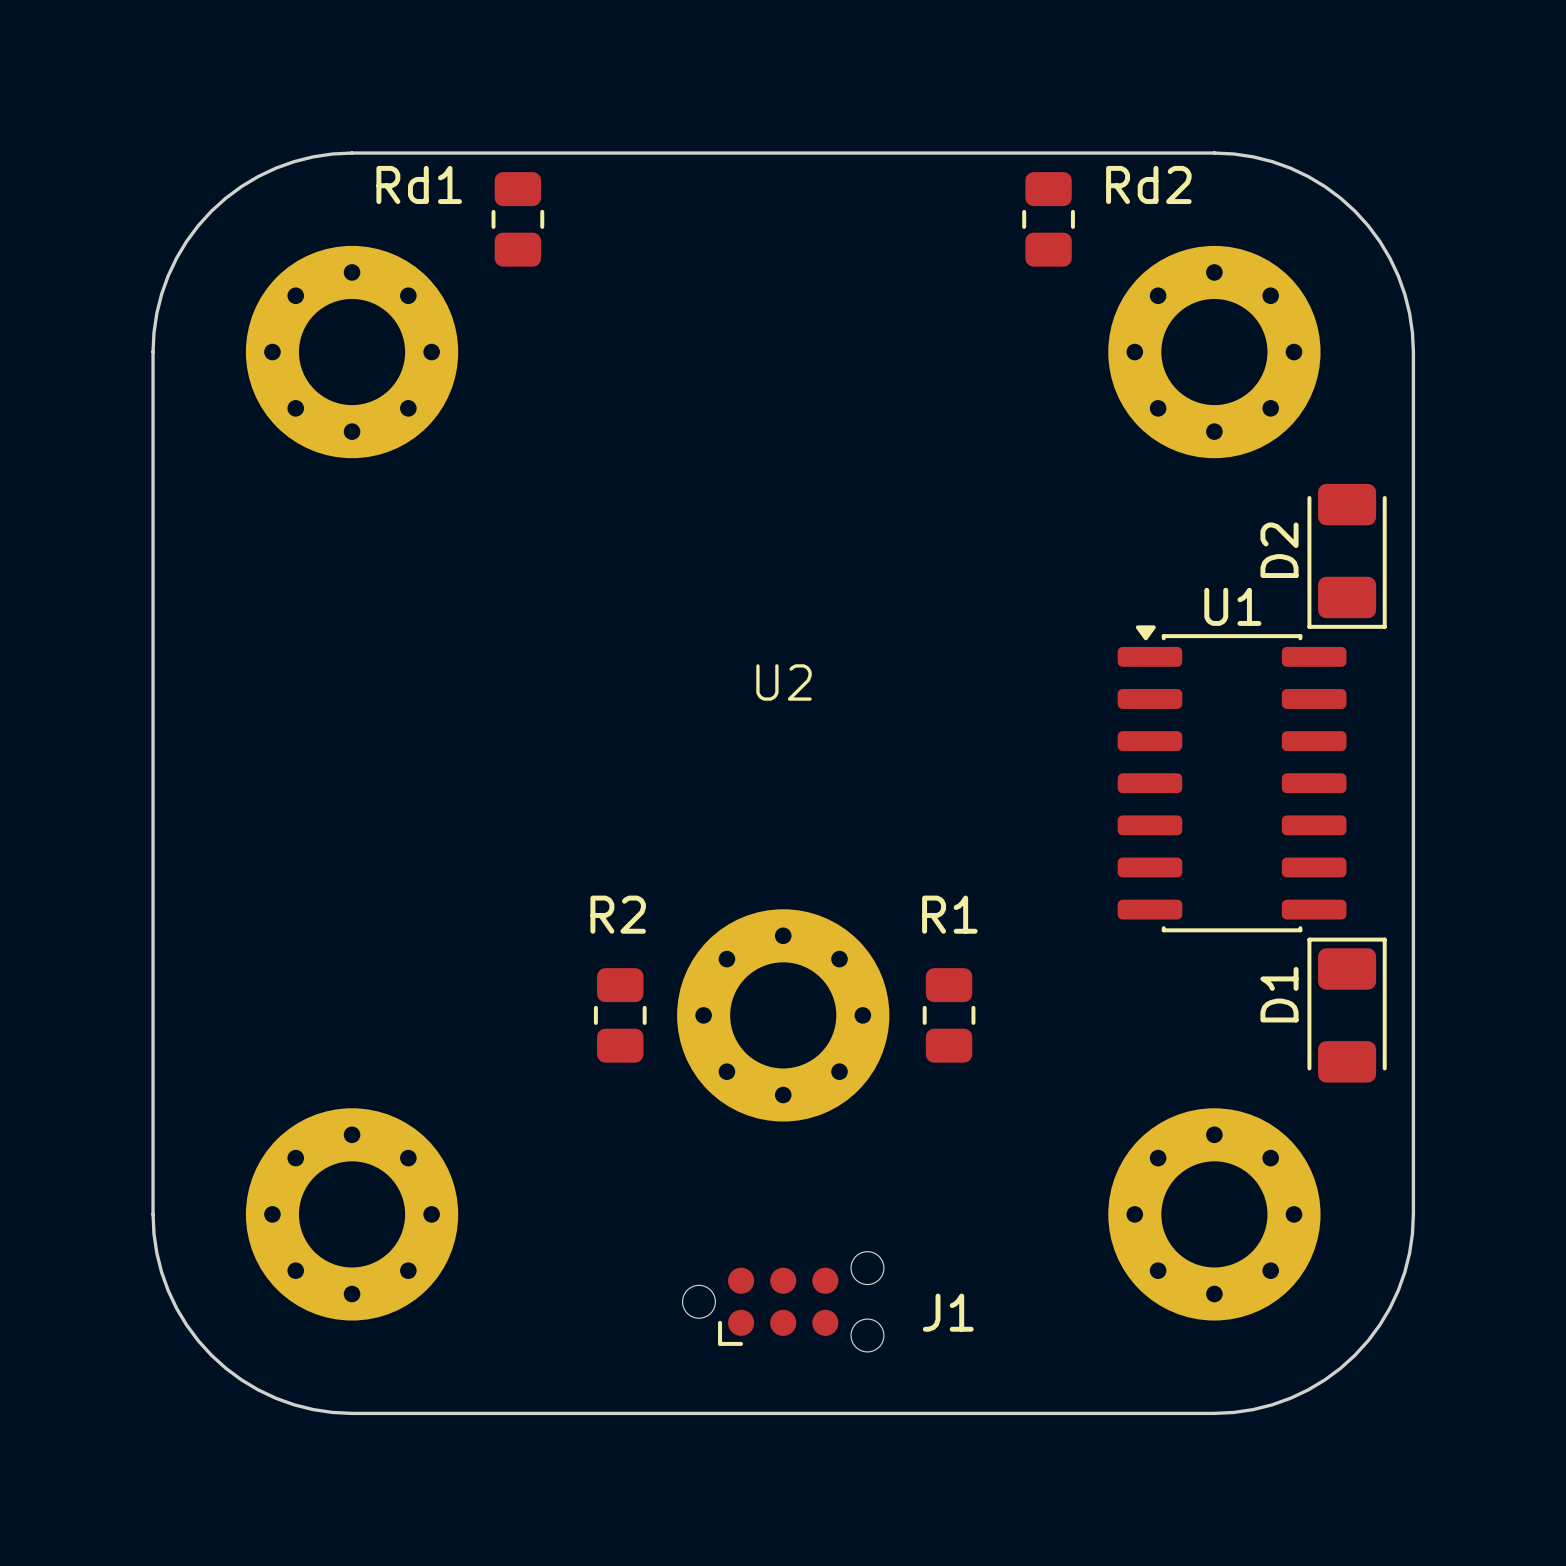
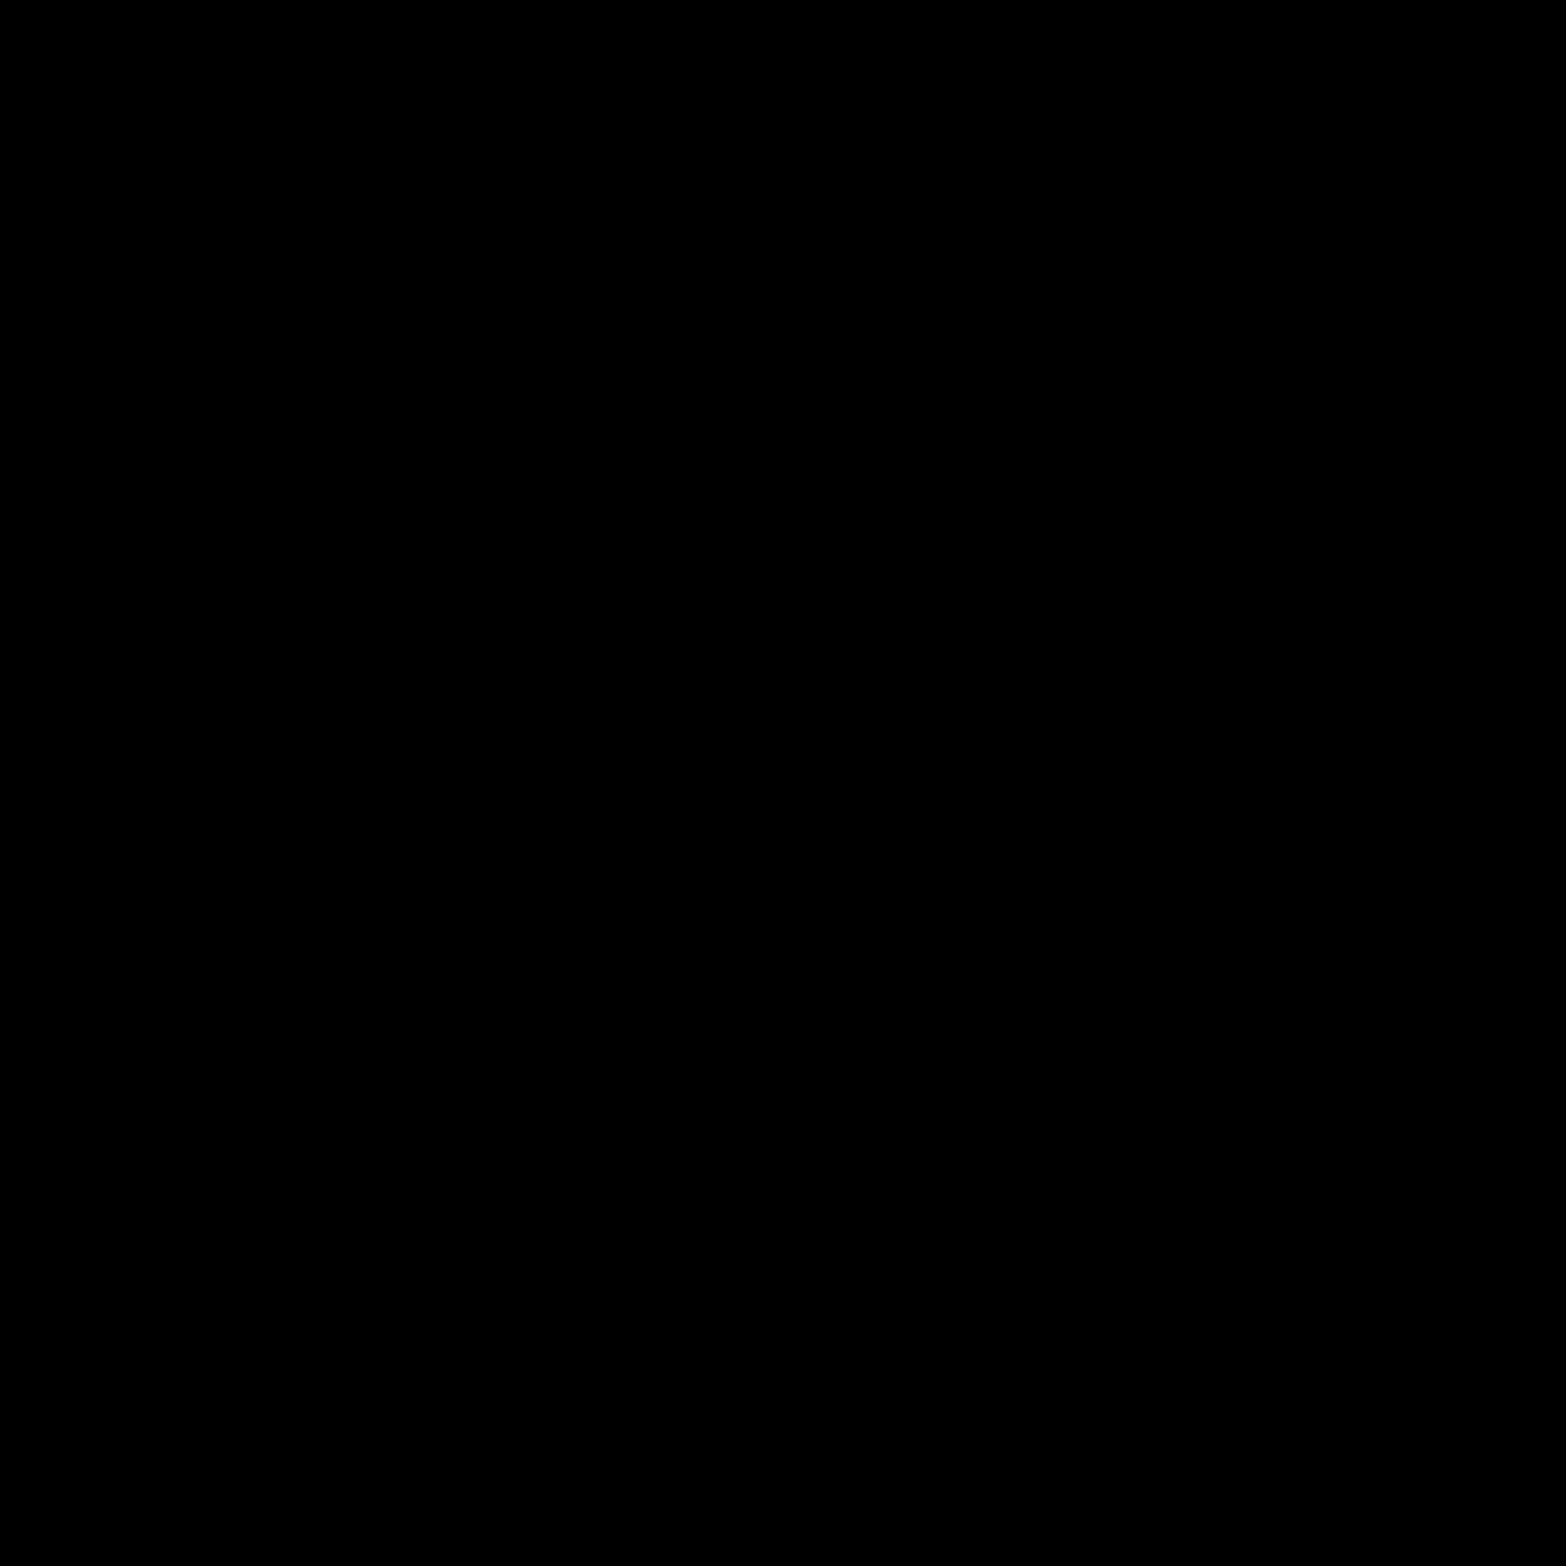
Rd1: (517, 219) -> none
Rd2: (1048, 219) -> none
D2: (1347, 556) -> none
U1: (1232, 778) -> none
U2: (783, 783) -> none
D1: (1347, 1010) -> none
R2: (620, 1015) -> none
R1: (949, 1015) -> none
J1: (783, 1301) -> none

